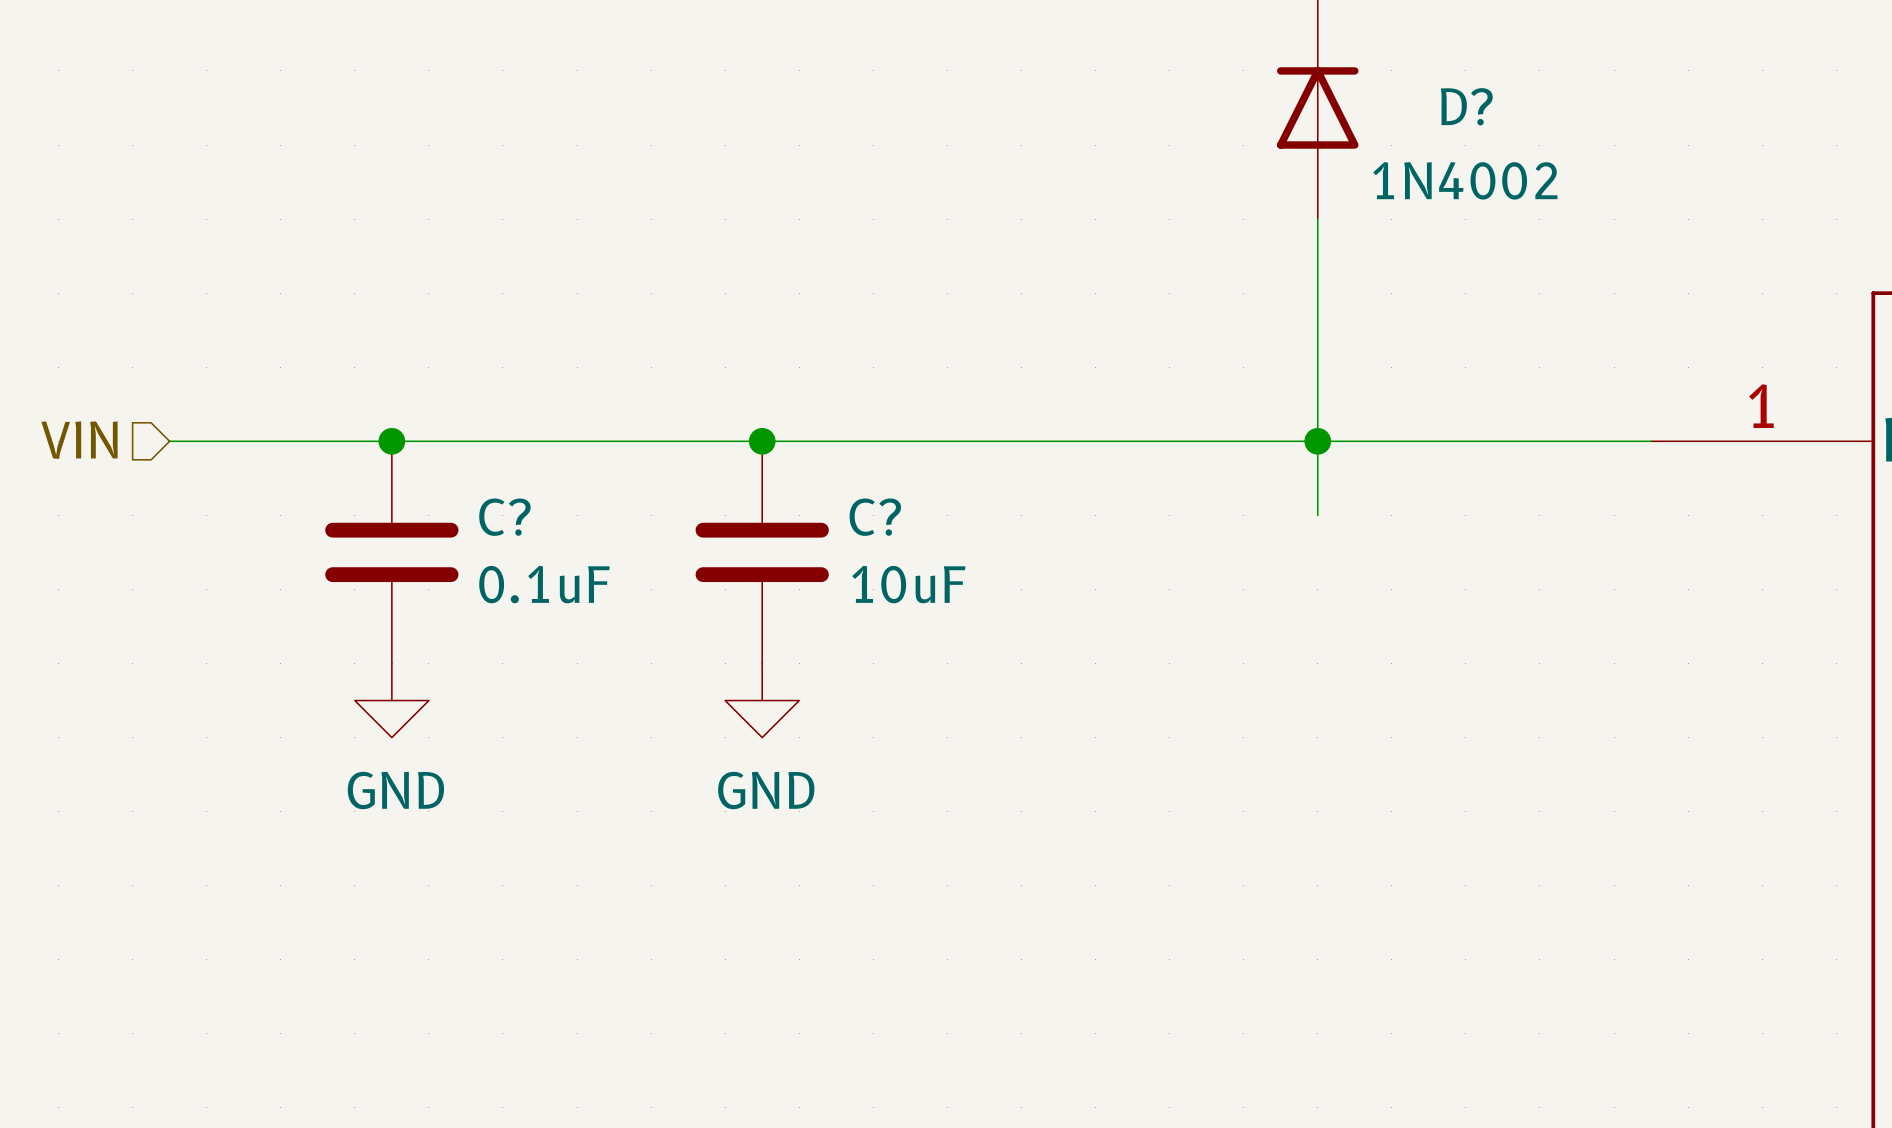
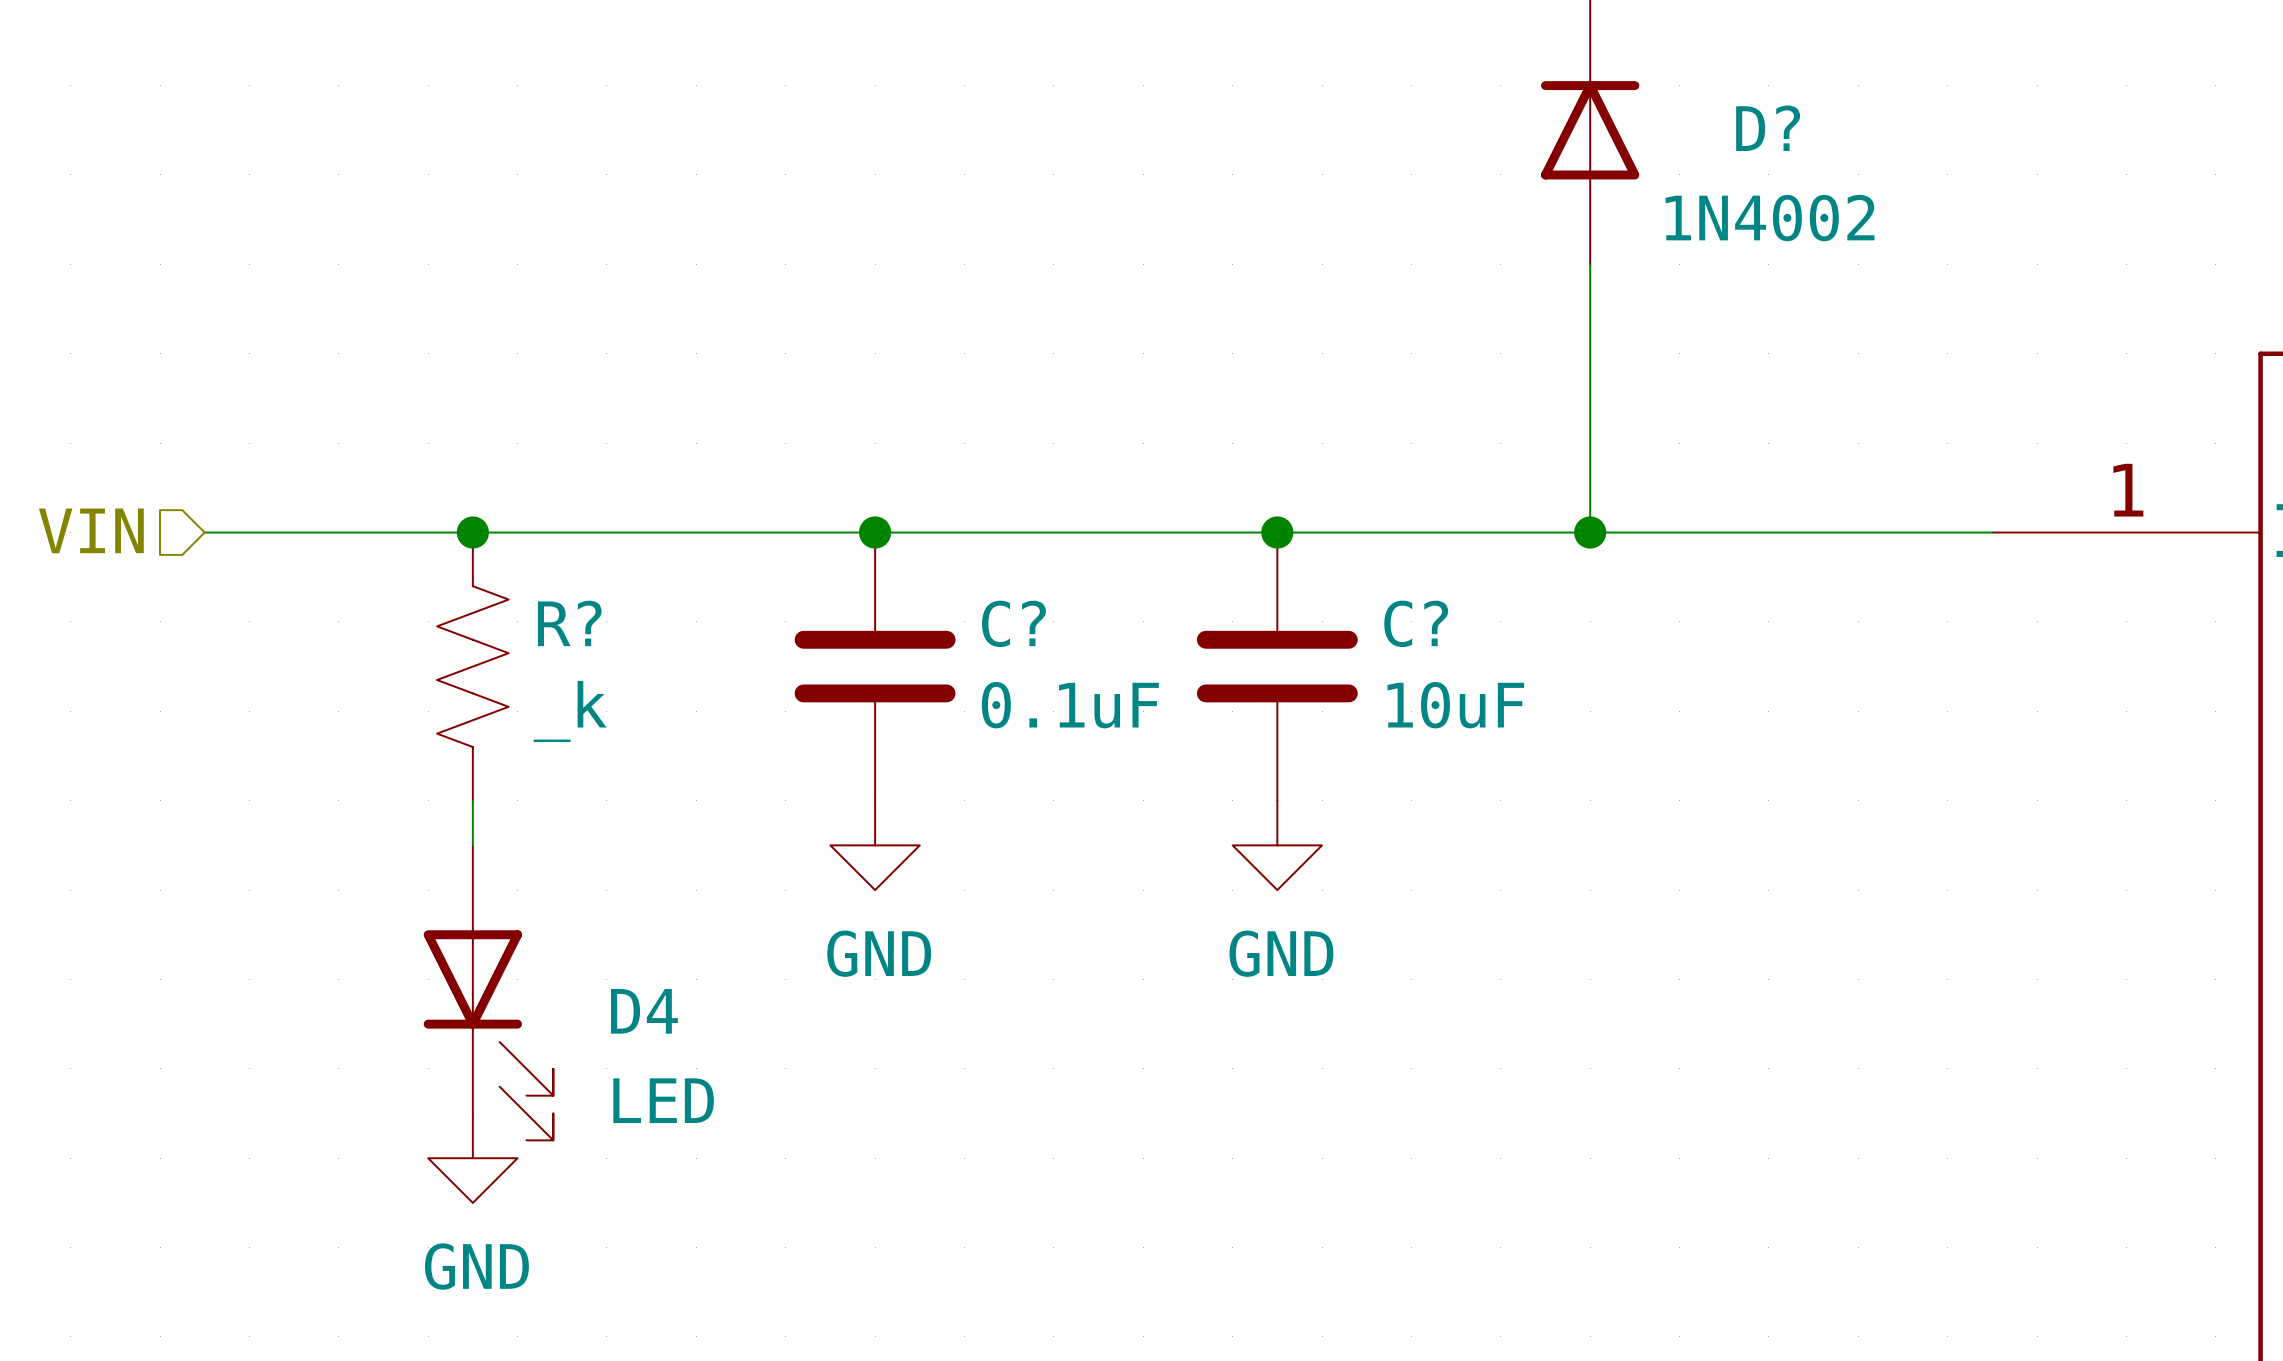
junction position: (762, 441) -> (875, 532)
junction: none -> (1277, 532)
wire: (1317, 441) (1317, 515) -> none
C? position: (391, 552) -> (875, 666)
R?: none -> _k (472, 666)
C? position: (762, 552) -> (1277, 666)
power symbol: GND (391, 700) -> none
power symbol position: GND (762, 700) -> GND (875, 845)
power symbol: none -> GND (1277, 845)
D4: none -> LED (488, 992)
power symbol: none -> GND (472, 1158)

